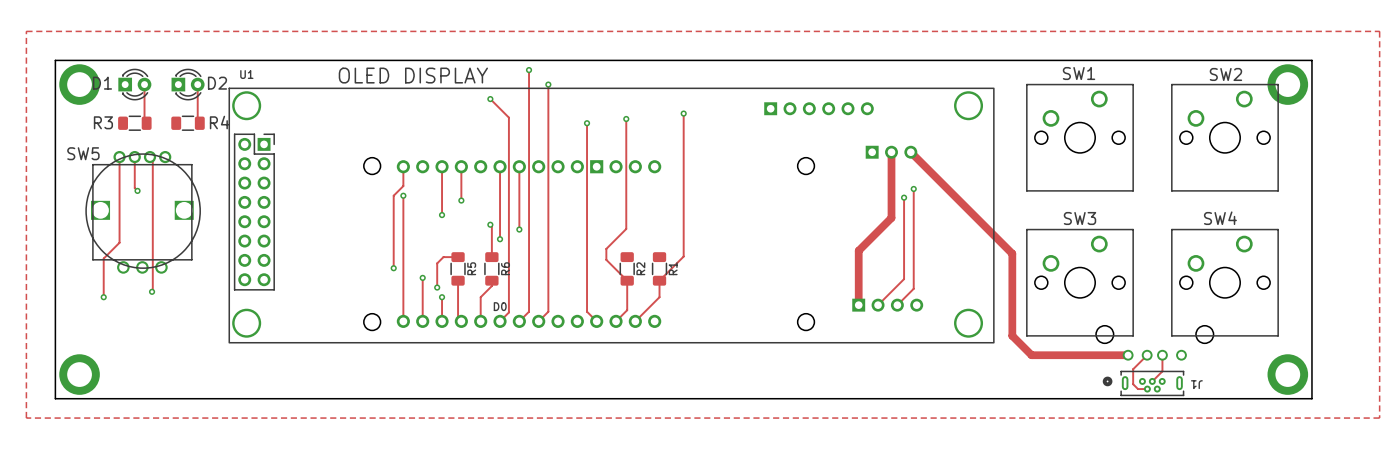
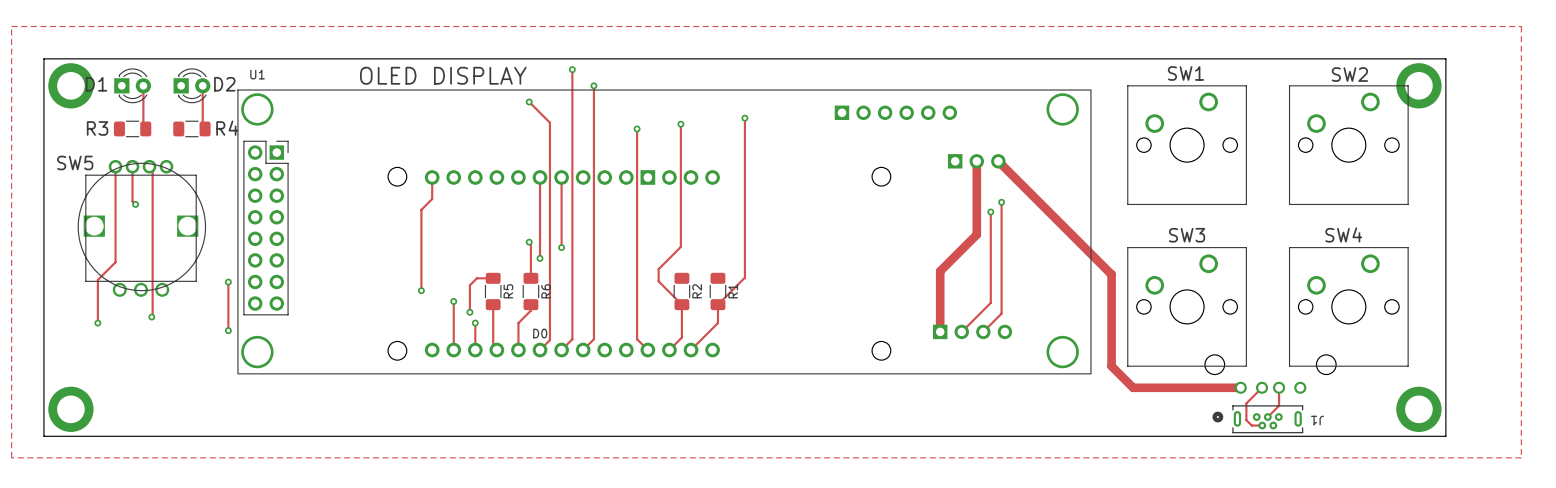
track: (442, 166) (442, 215) -> none
track: (461, 166) (461, 200) -> none
track: (403, 195) (403, 321) -> none
via: (403, 195) -> none
via: (461, 200) -> none
via: (442, 215) -> none
track: none -> (228, 282) (228, 330)
via: none -> (228, 282)
via: none -> (228, 330)

